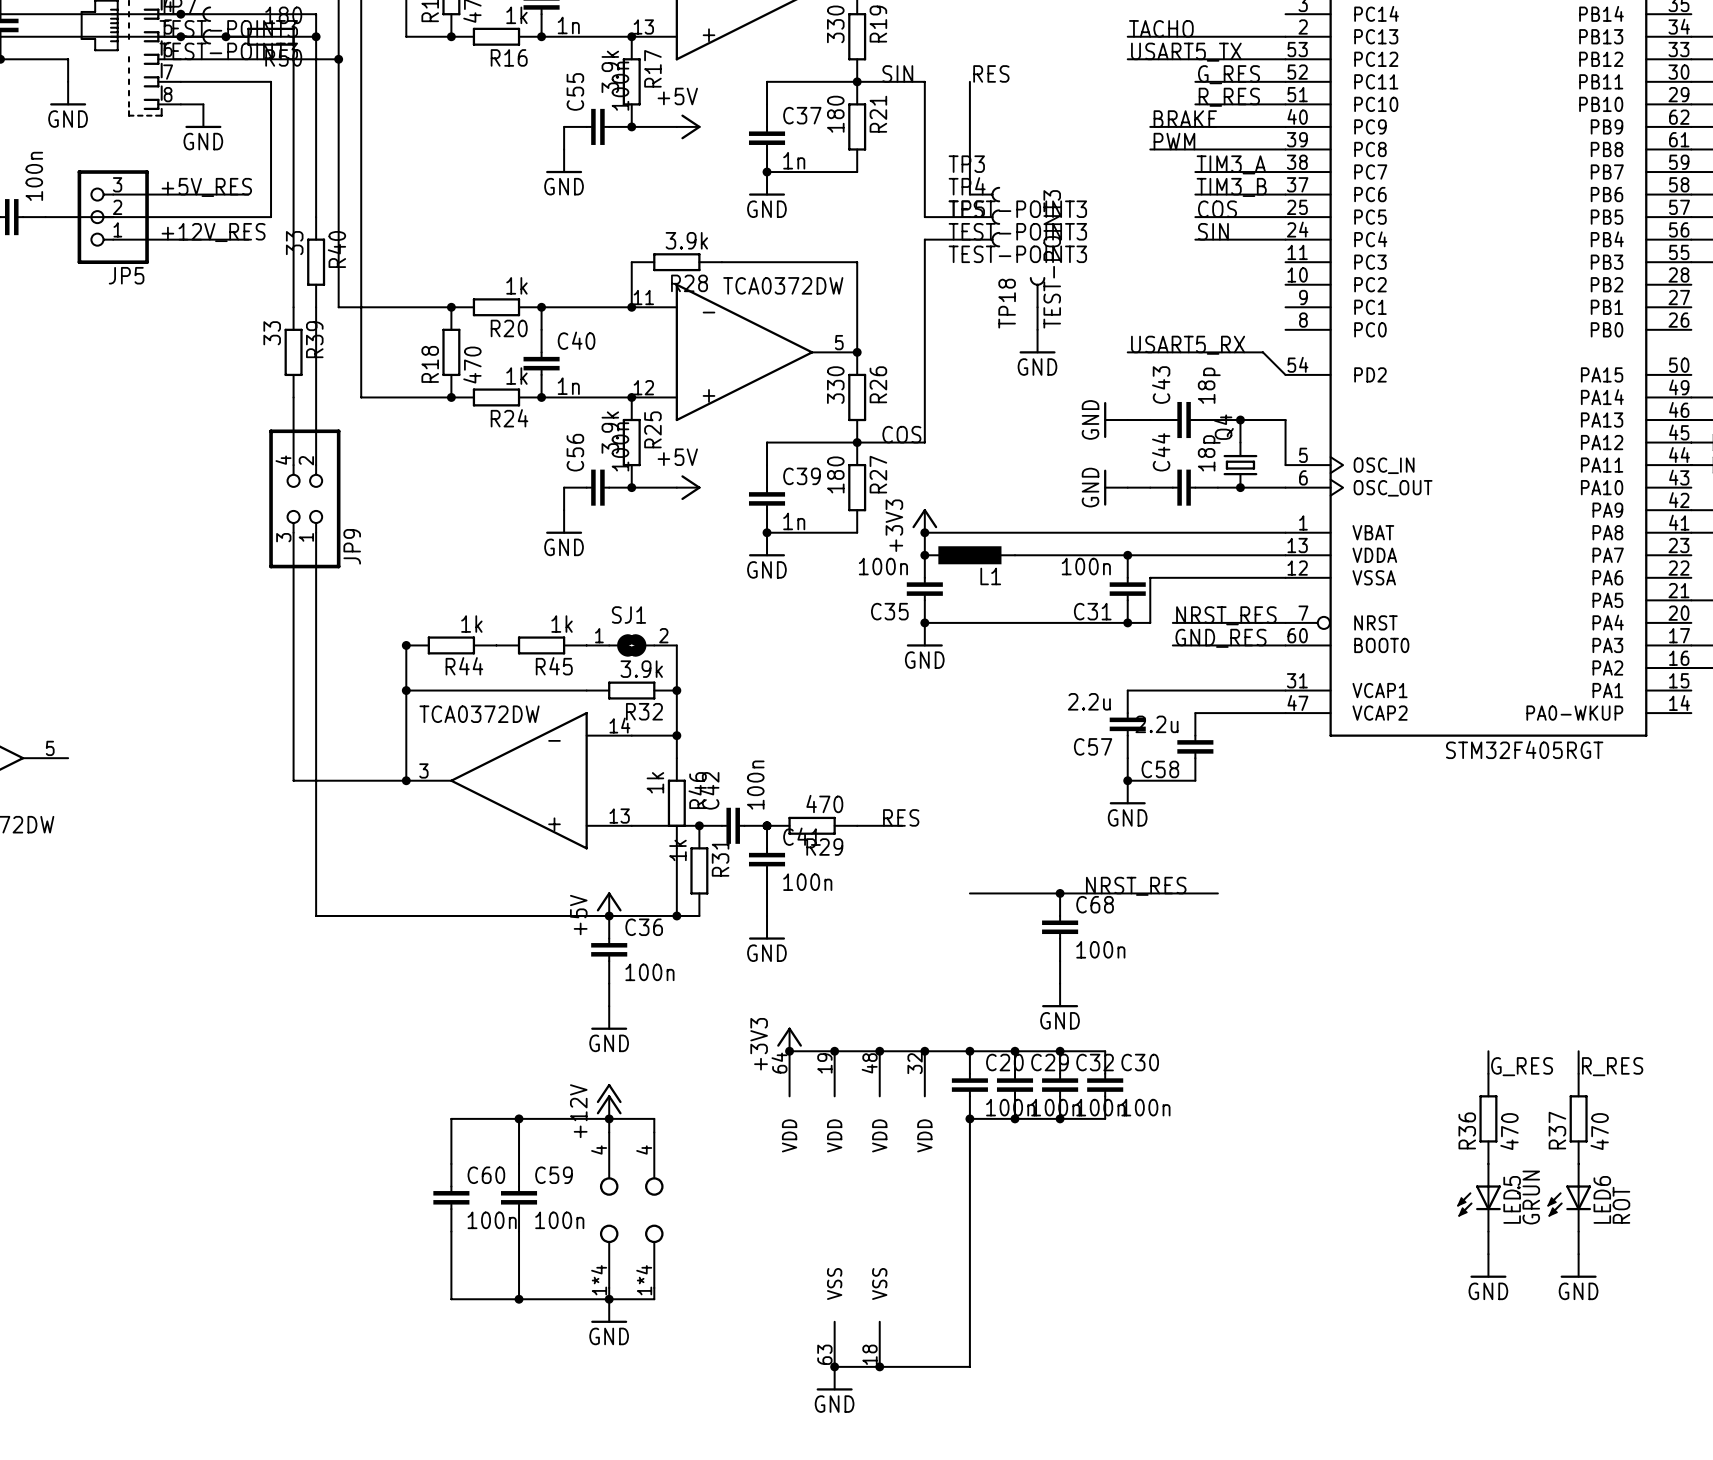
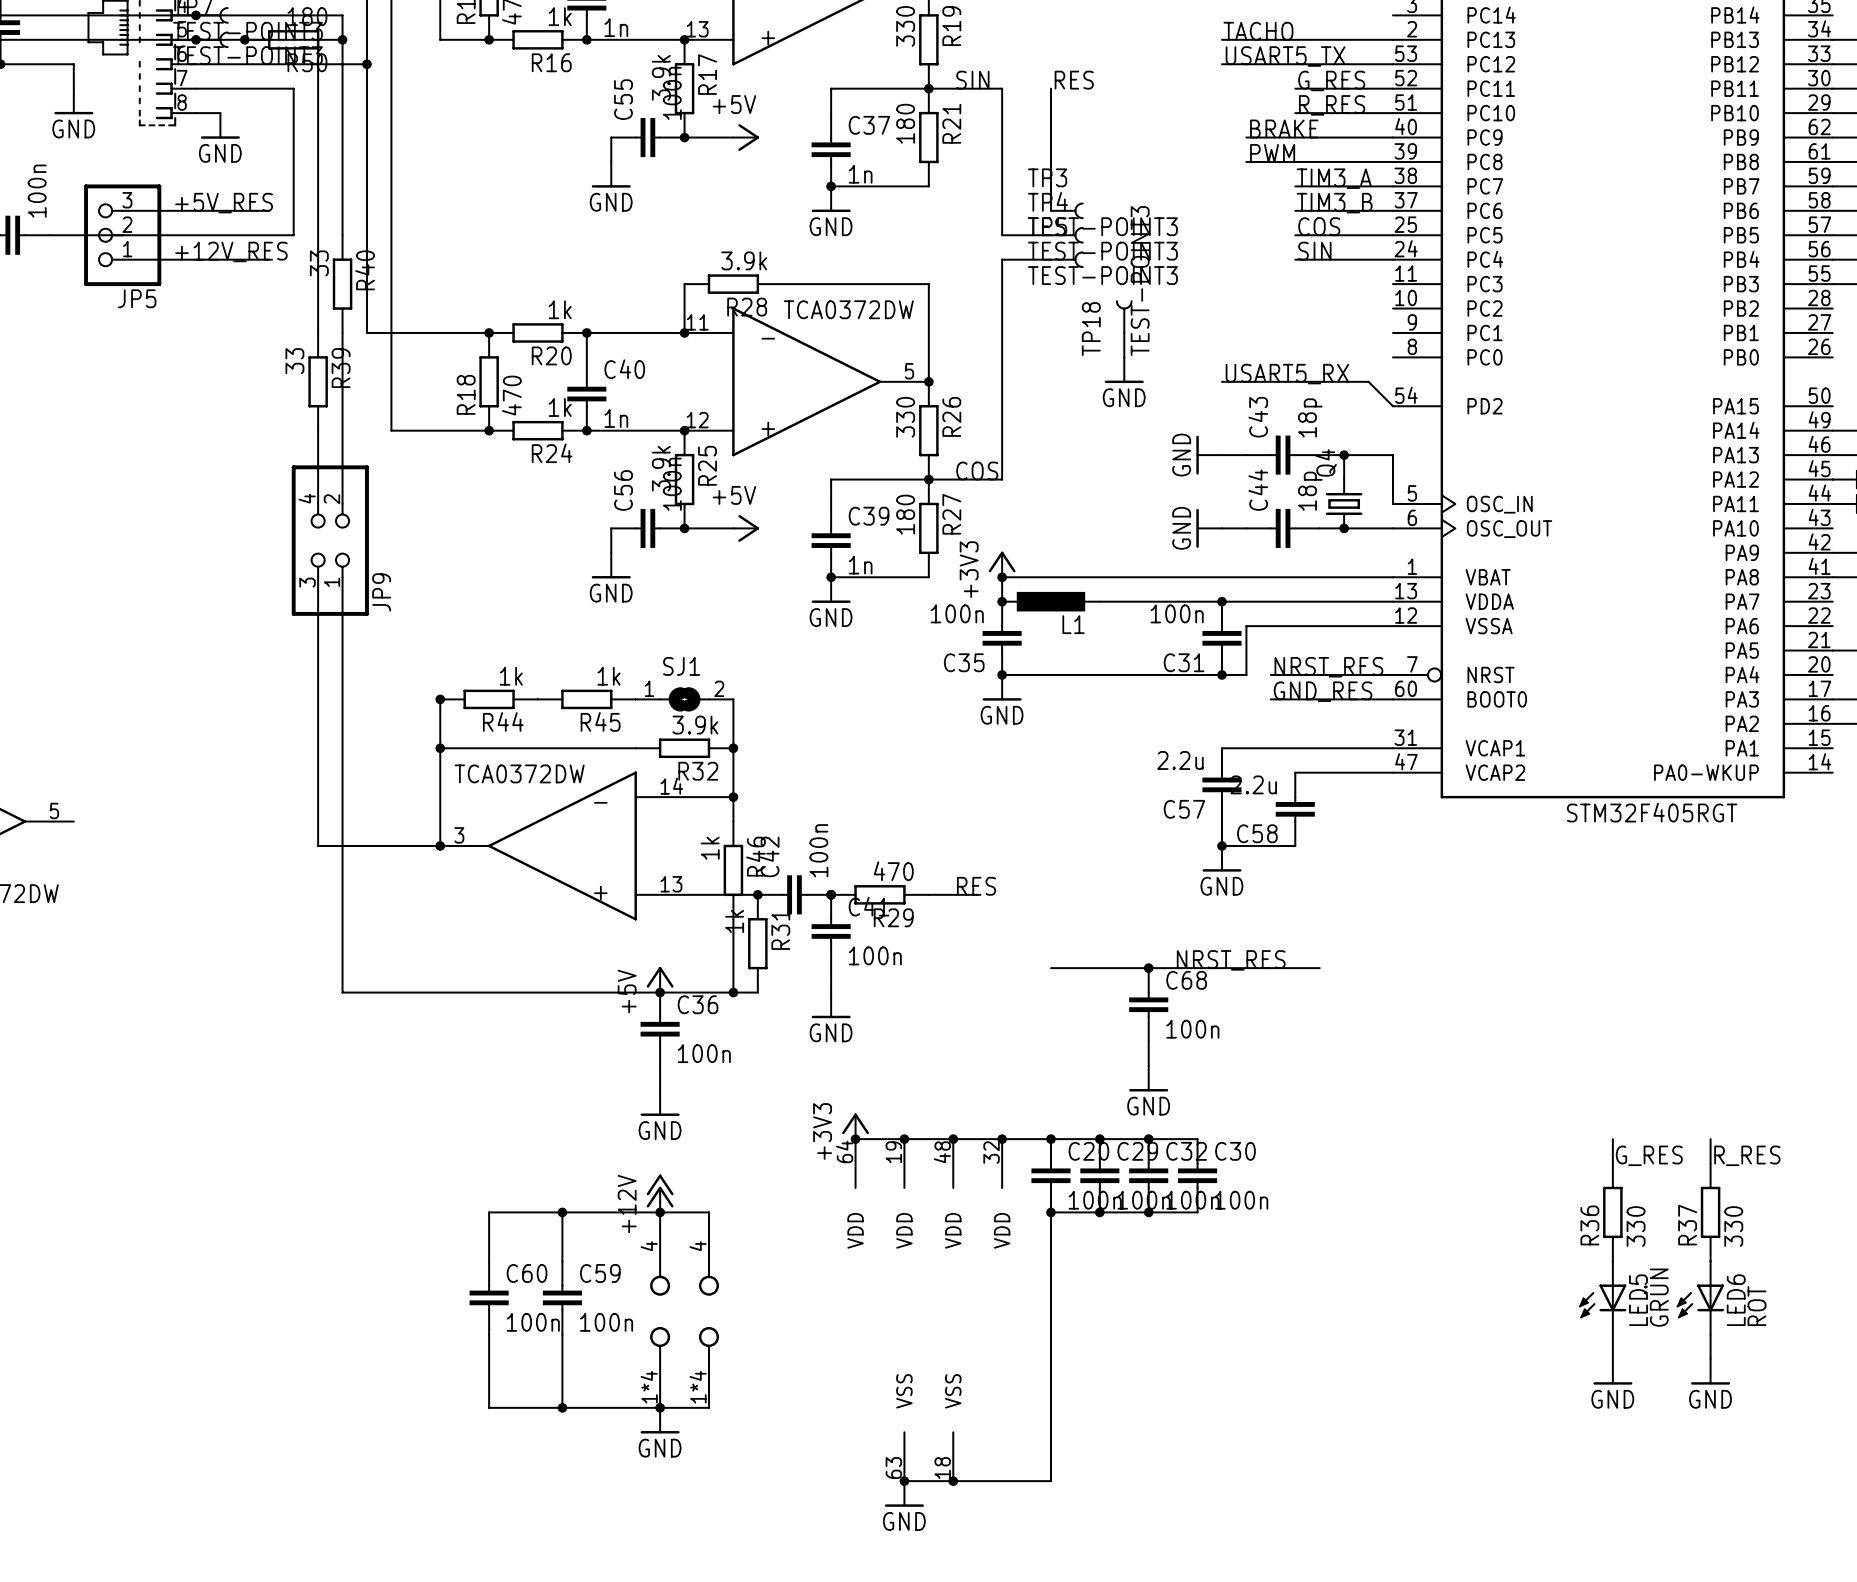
R36 value: 470 (1509, 1131) -> 330 (1636, 1226)
R37 value: 470 (1599, 1131) -> 330 (1733, 1226)

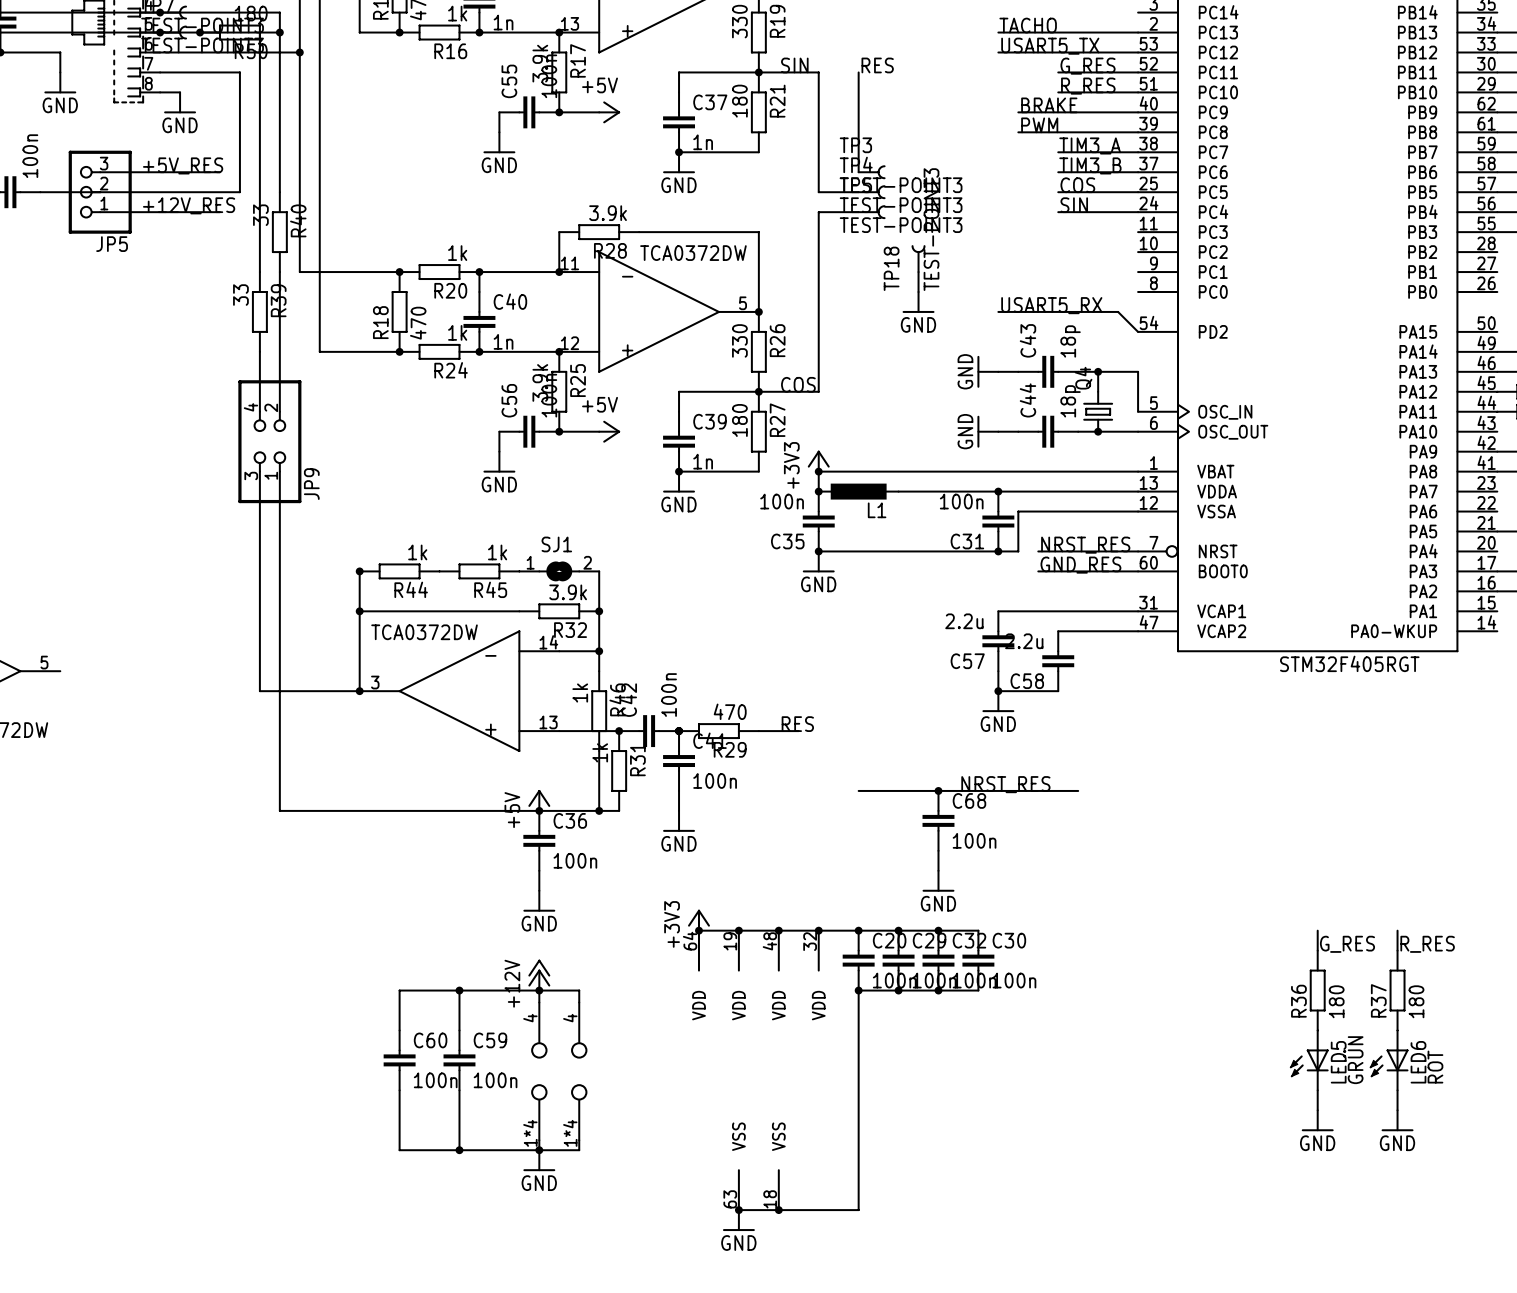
R36 value: 330 (1636, 1226) -> 180 (1336, 1001)
R37 value: 330 (1733, 1226) -> 180 (1416, 1001)

